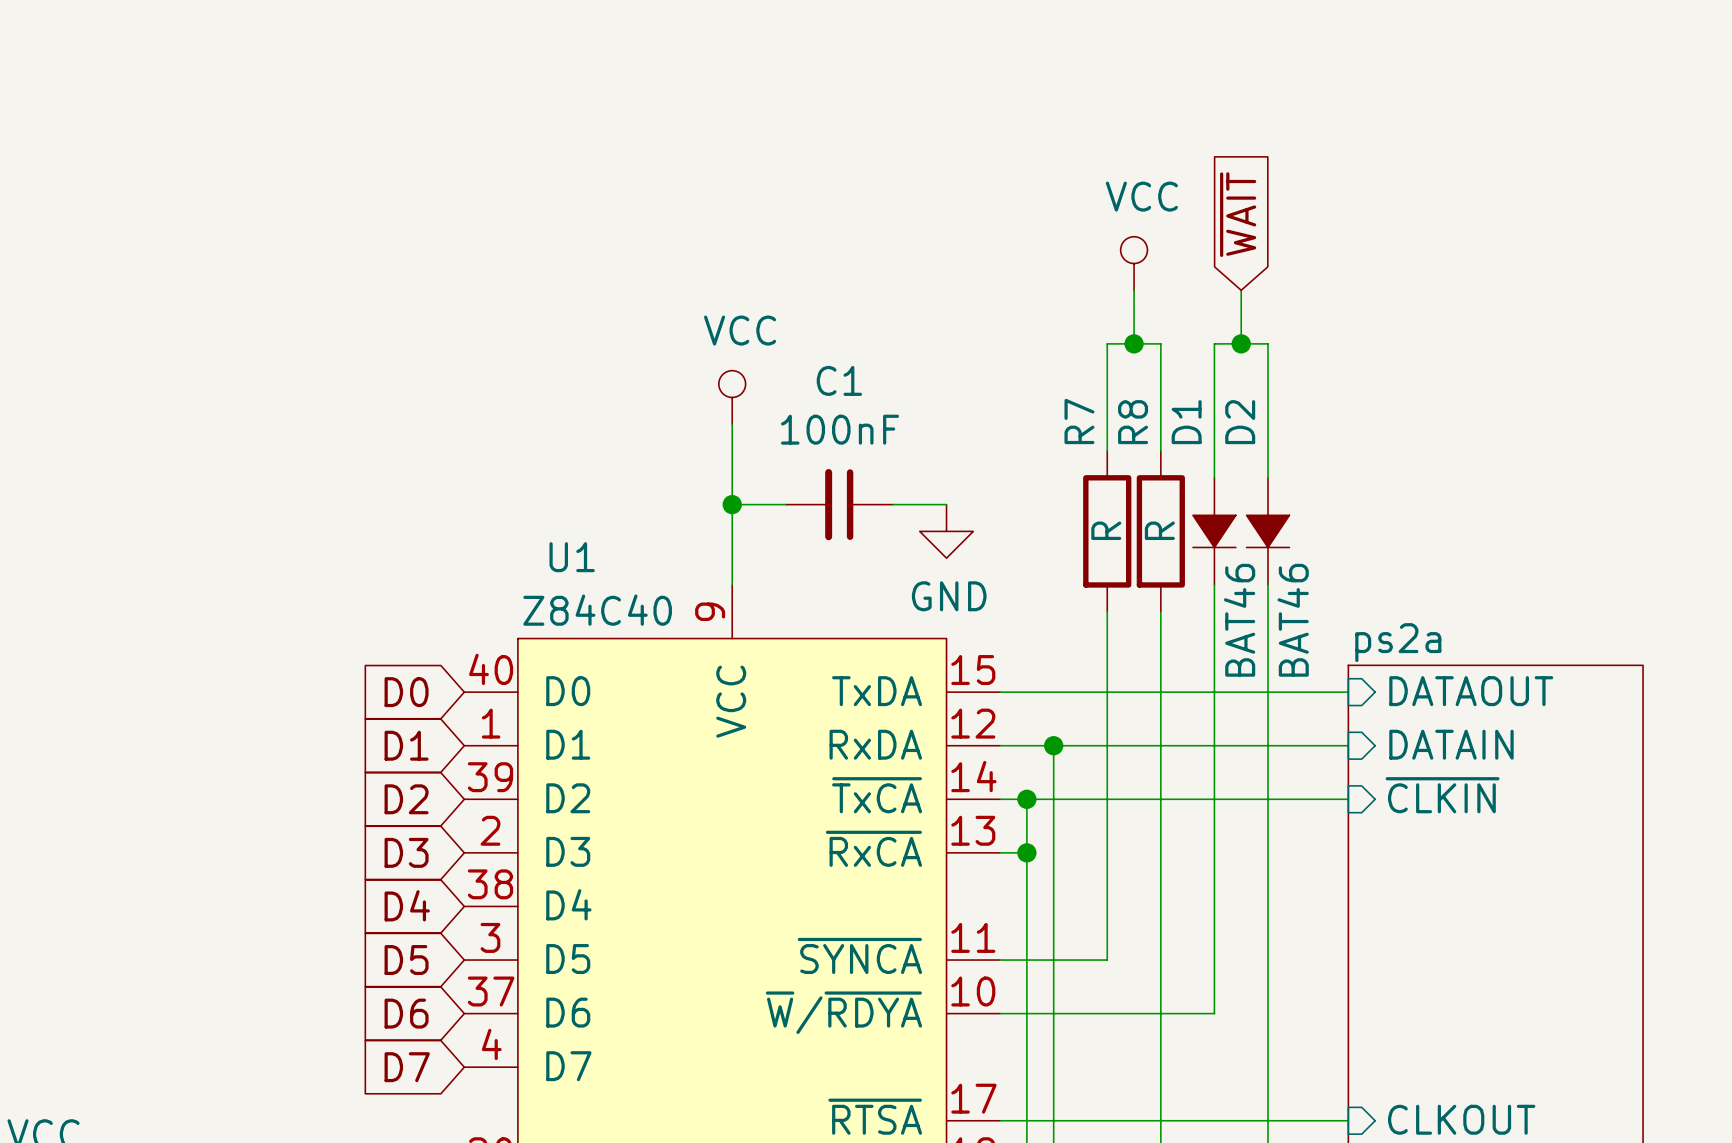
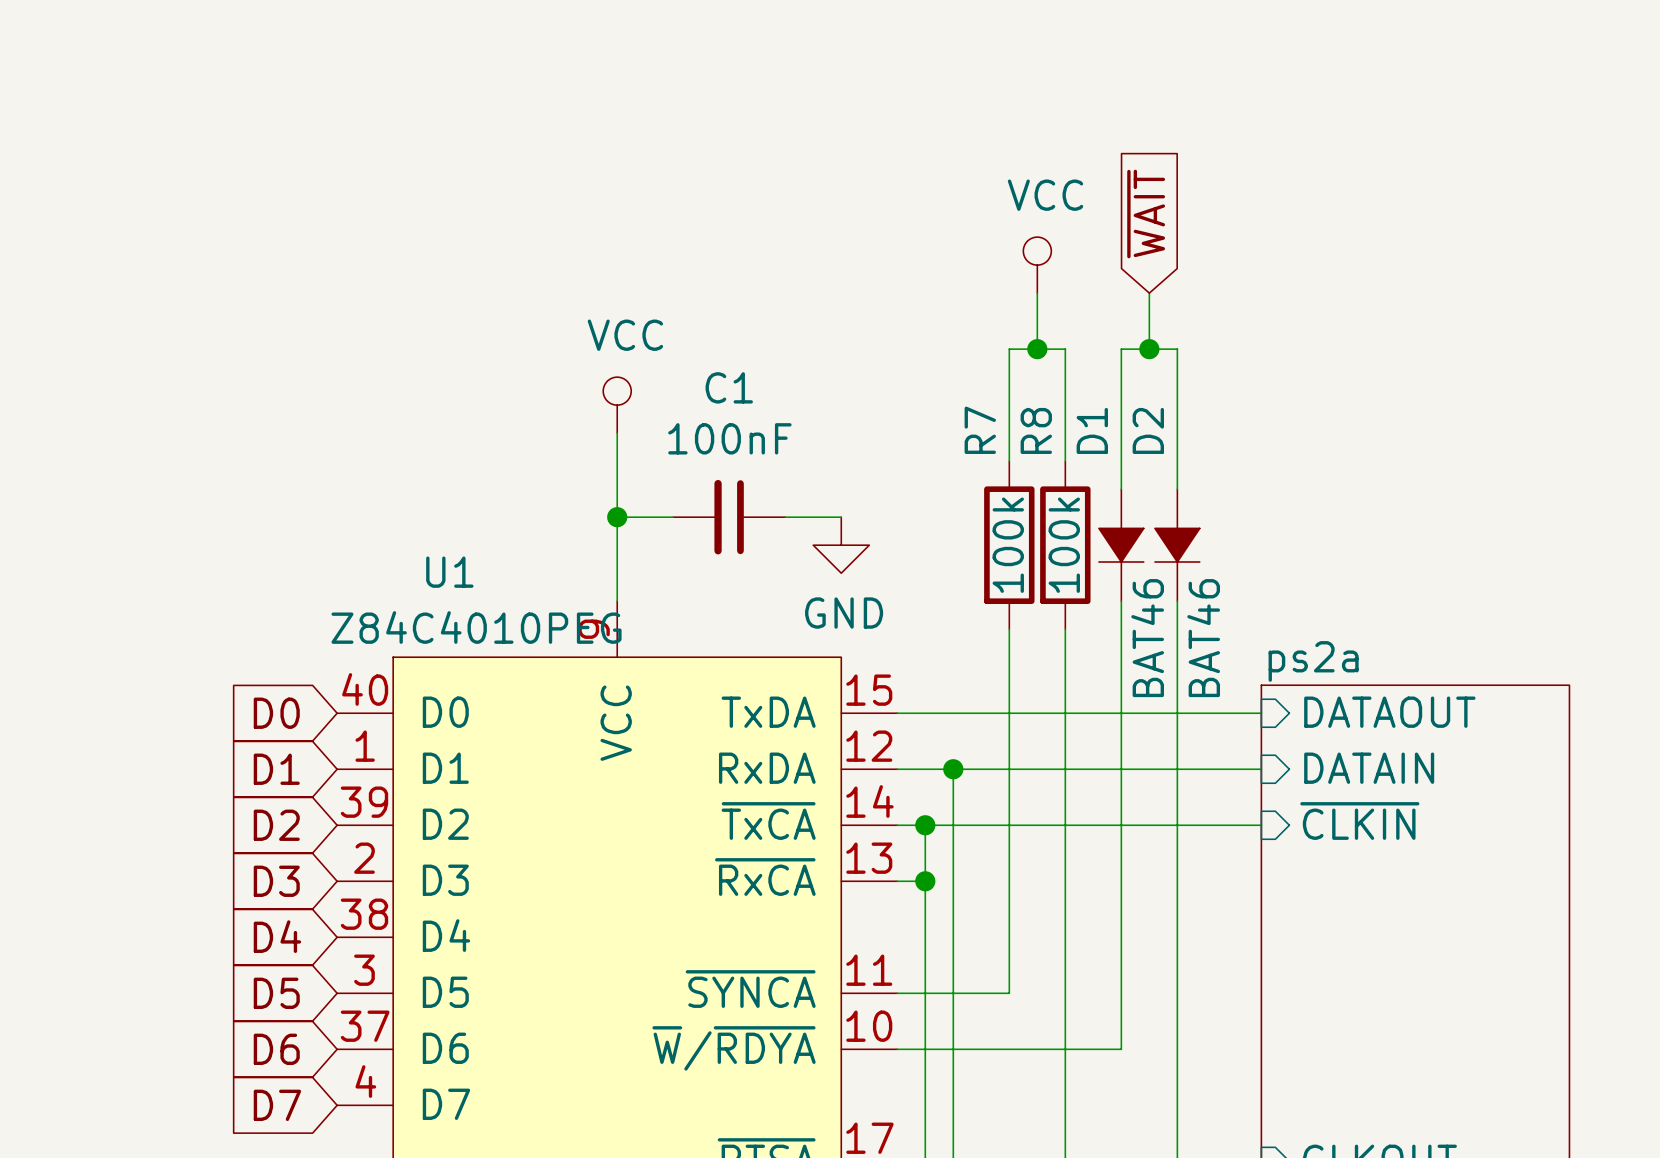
R7 value: R (1106, 530) -> 100k (1008, 545)
R8 value: R (1159, 530) -> 100k (1064, 545)
U1 value: Z84C40 (597, 610) -> Z84C4010PEG (476, 627)

